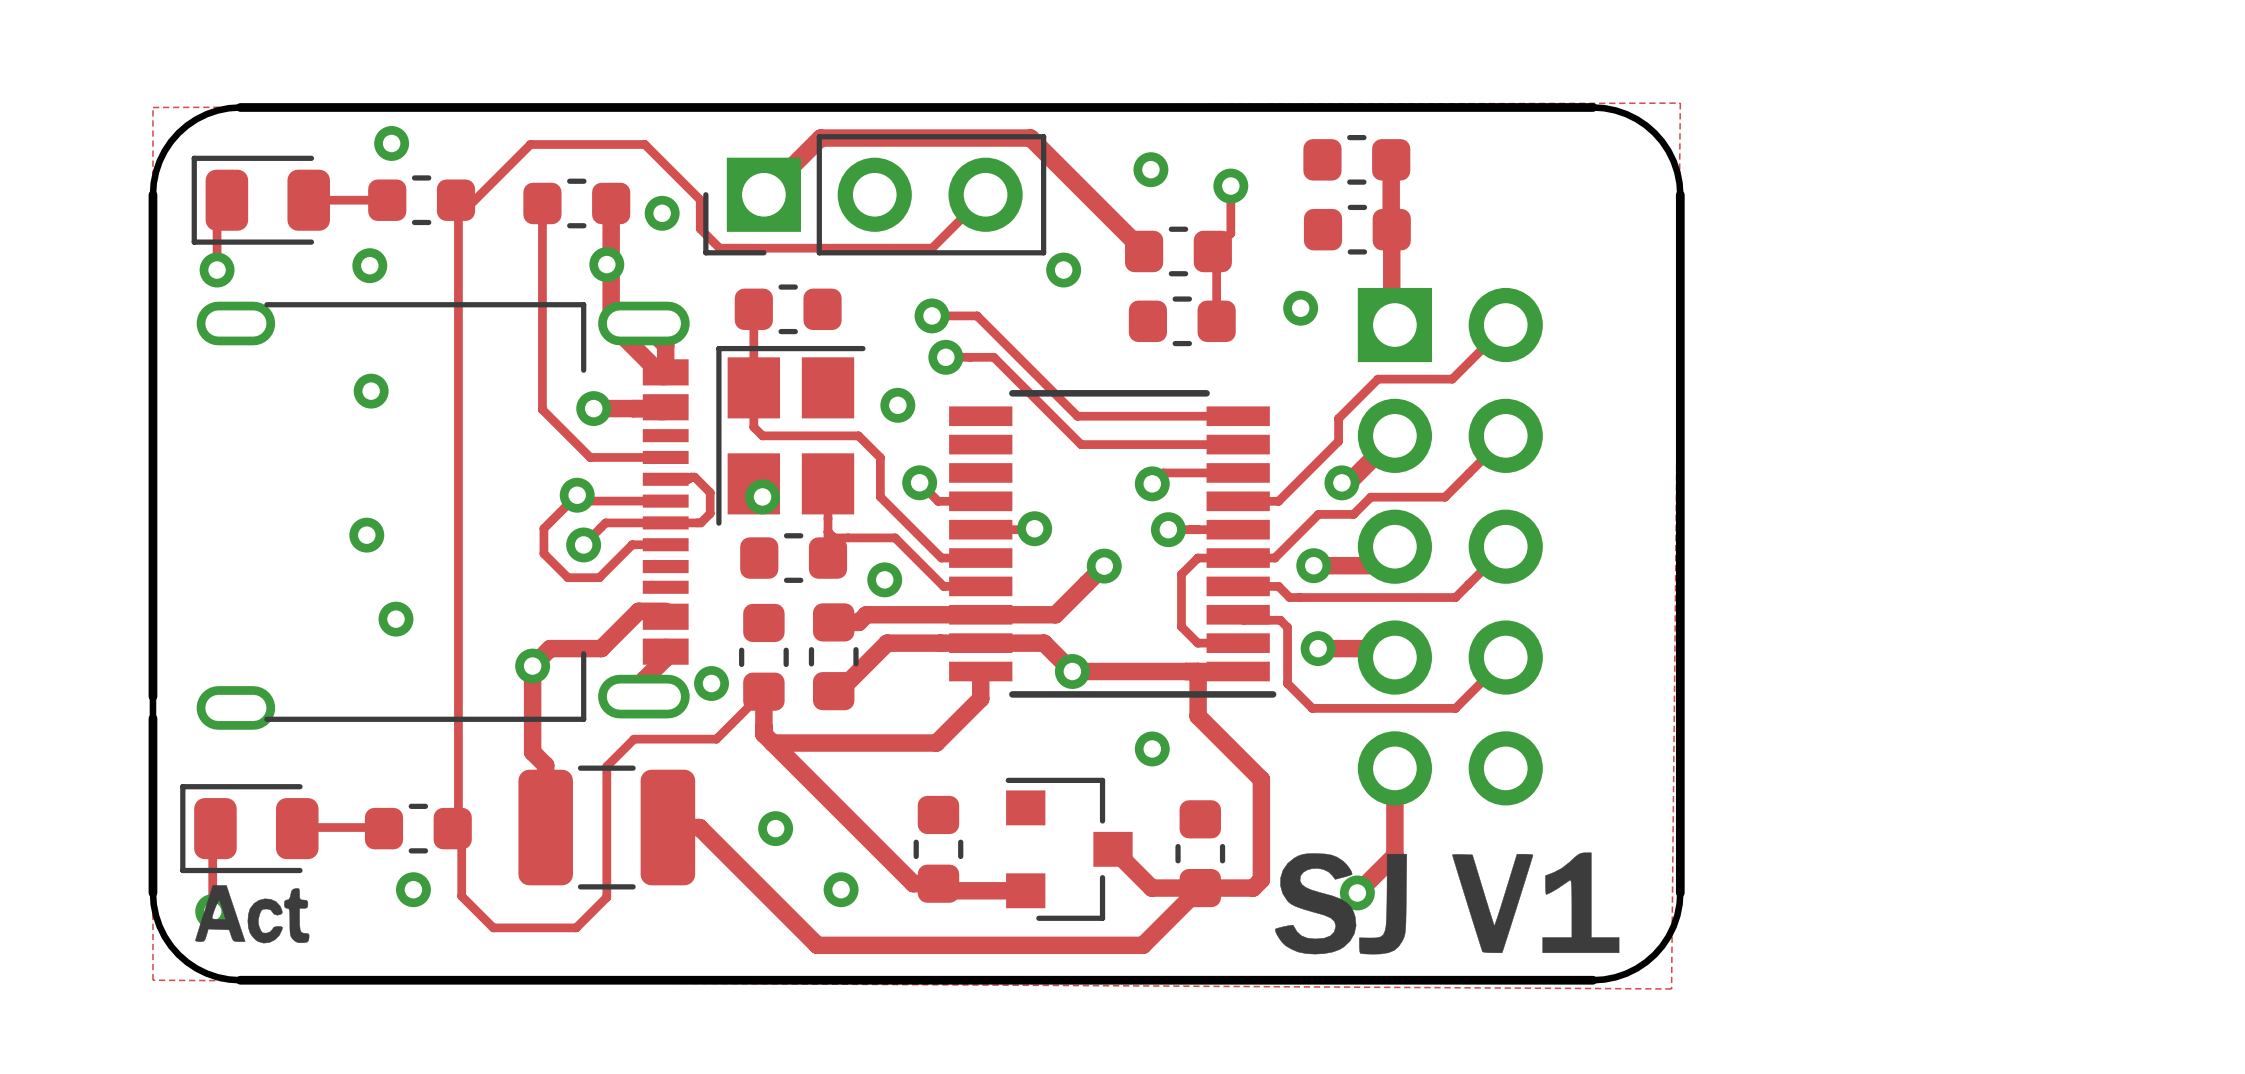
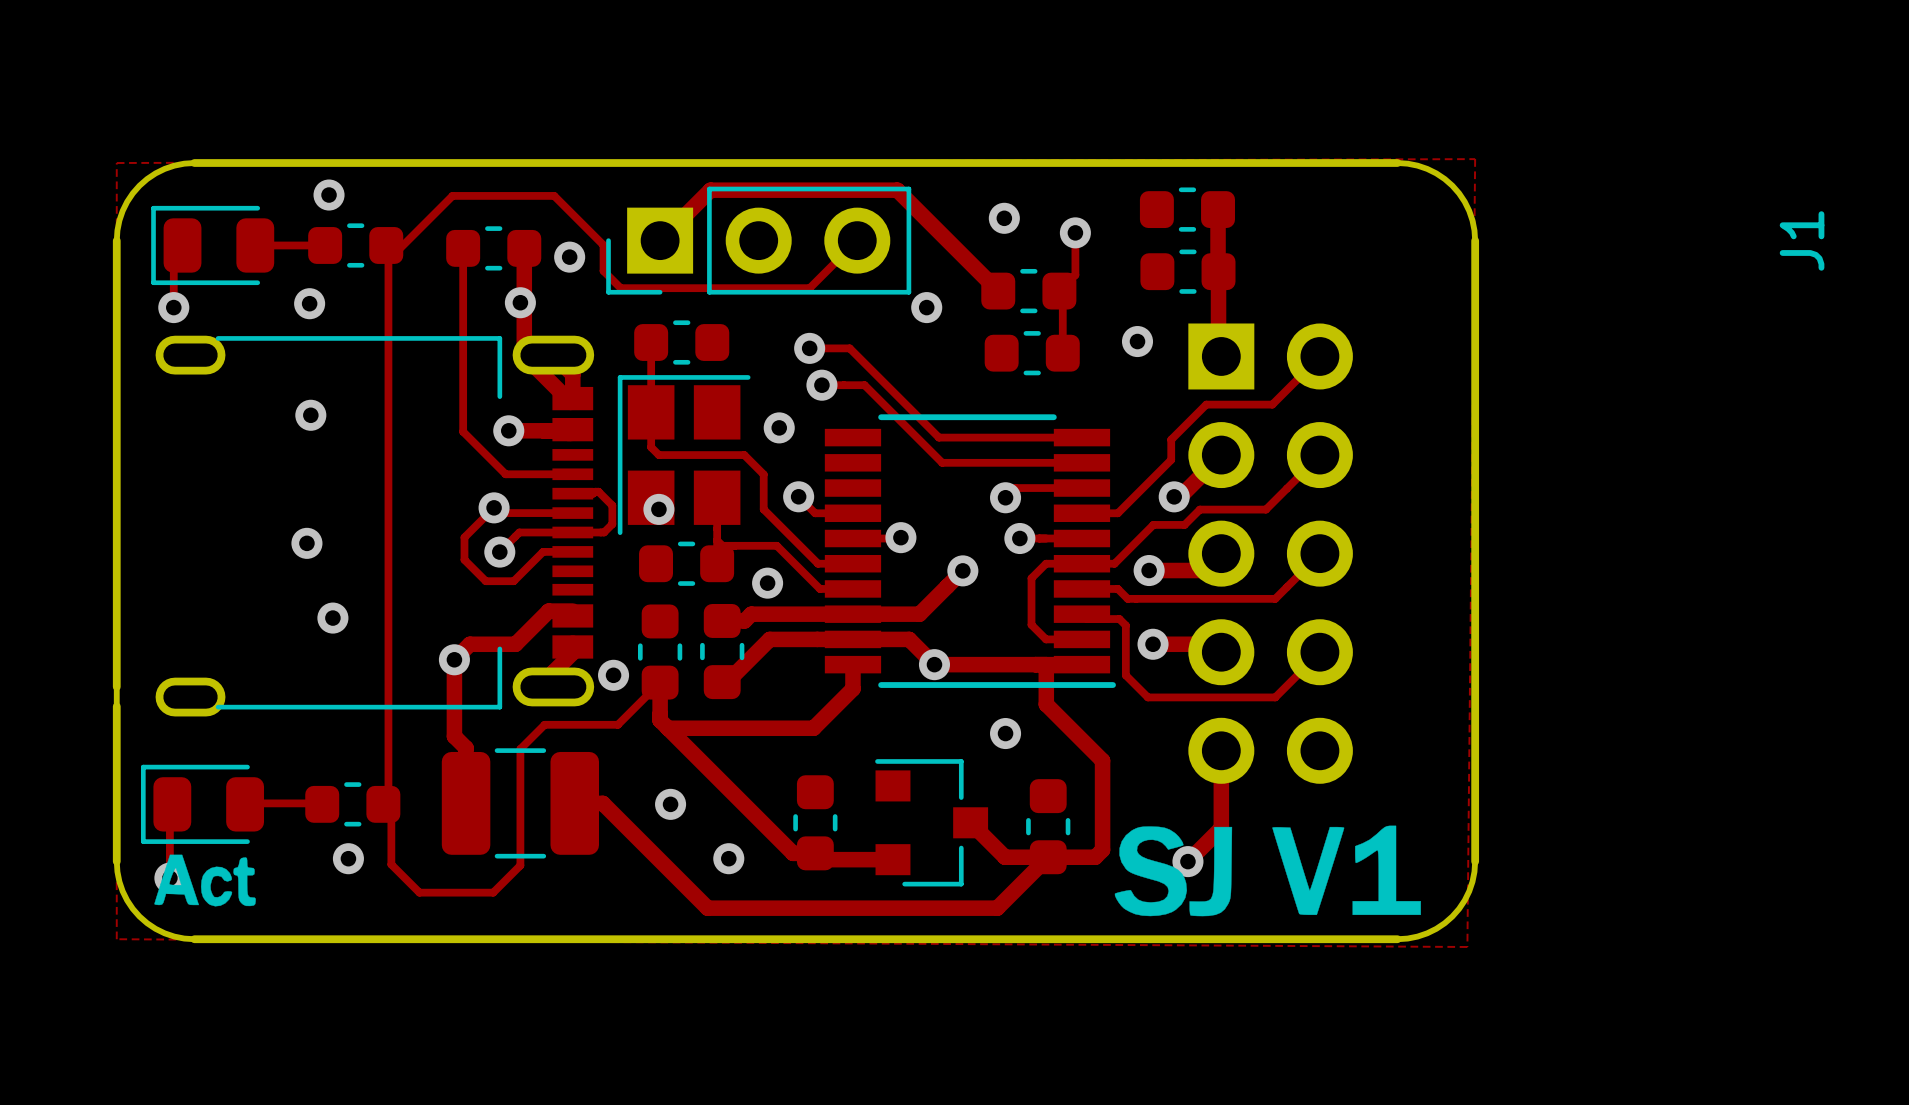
J1 name: none -> J1 (1802, 240)

